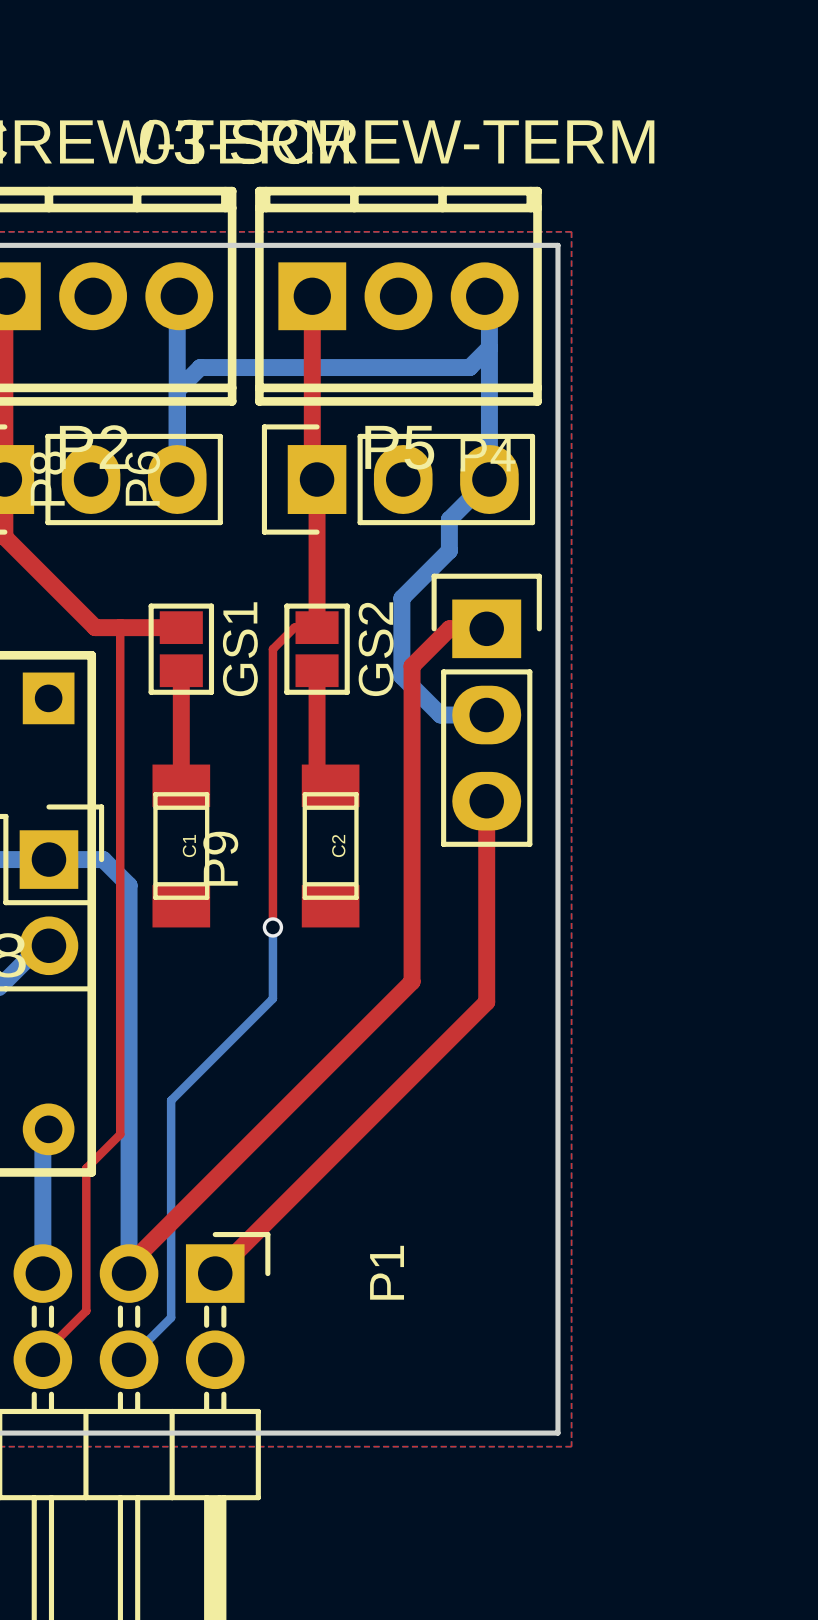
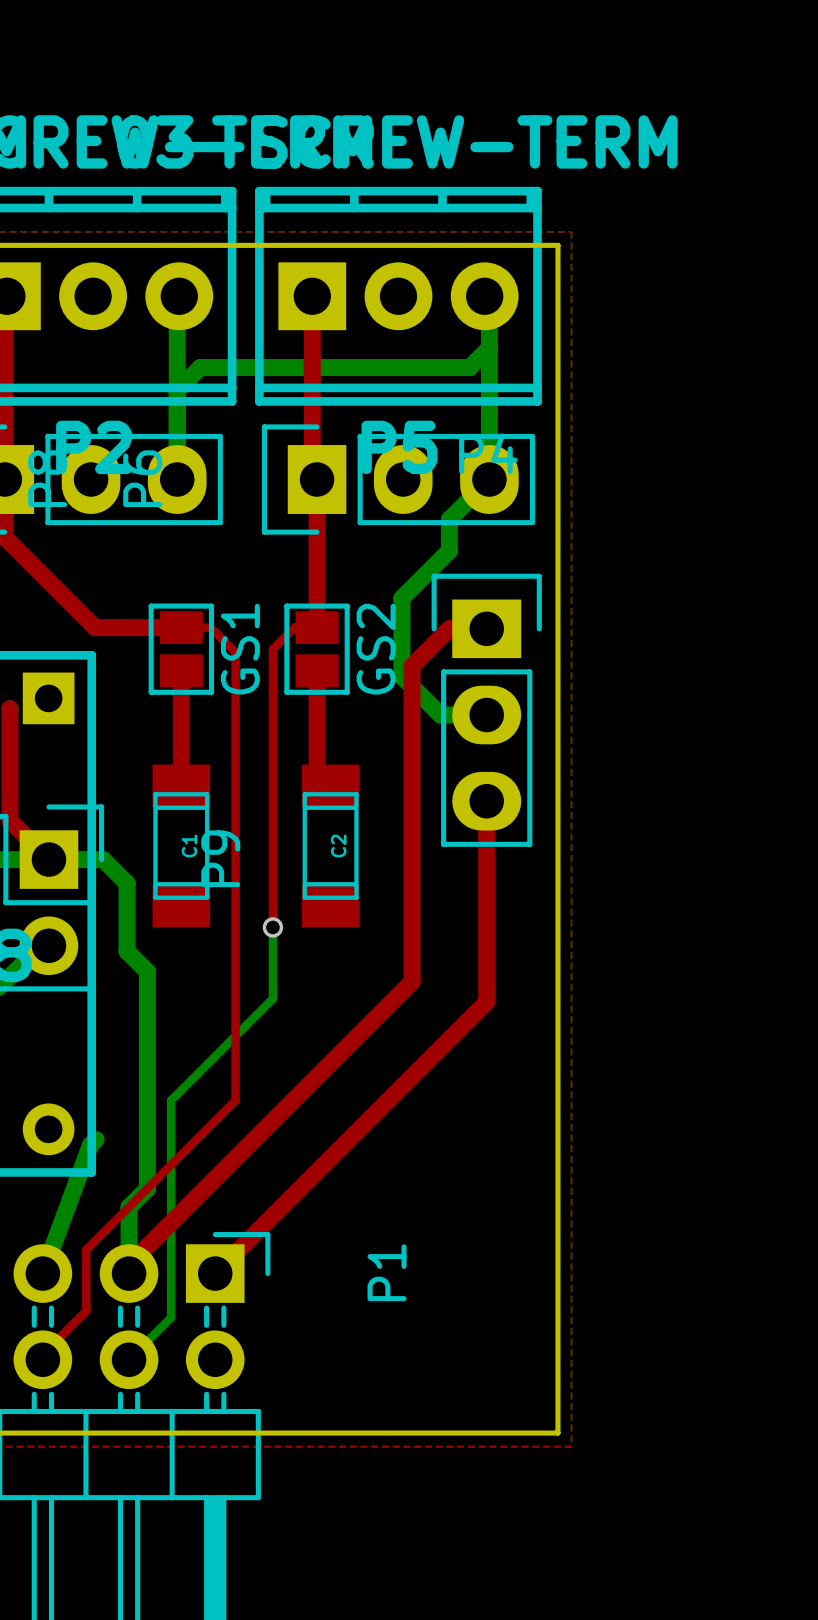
top track: (120, 627) (120, 1134) (86, 1168) (86, 1249) -> (181, 627) (210, 627) (235, 652) (235, 1100) (86, 1249)
top track: none -> (9, 708) (9, 820) (48, 859)
bottom track: (127, 883) (129, 885) (129, 1207) -> (127, 883) (127, 951) (147, 971) (147, 1188) (129, 1207)
bottom track: (48, 1129) (42, 1135) (42, 1273) -> (96, 1139) (90, 1145) (42, 1273)

